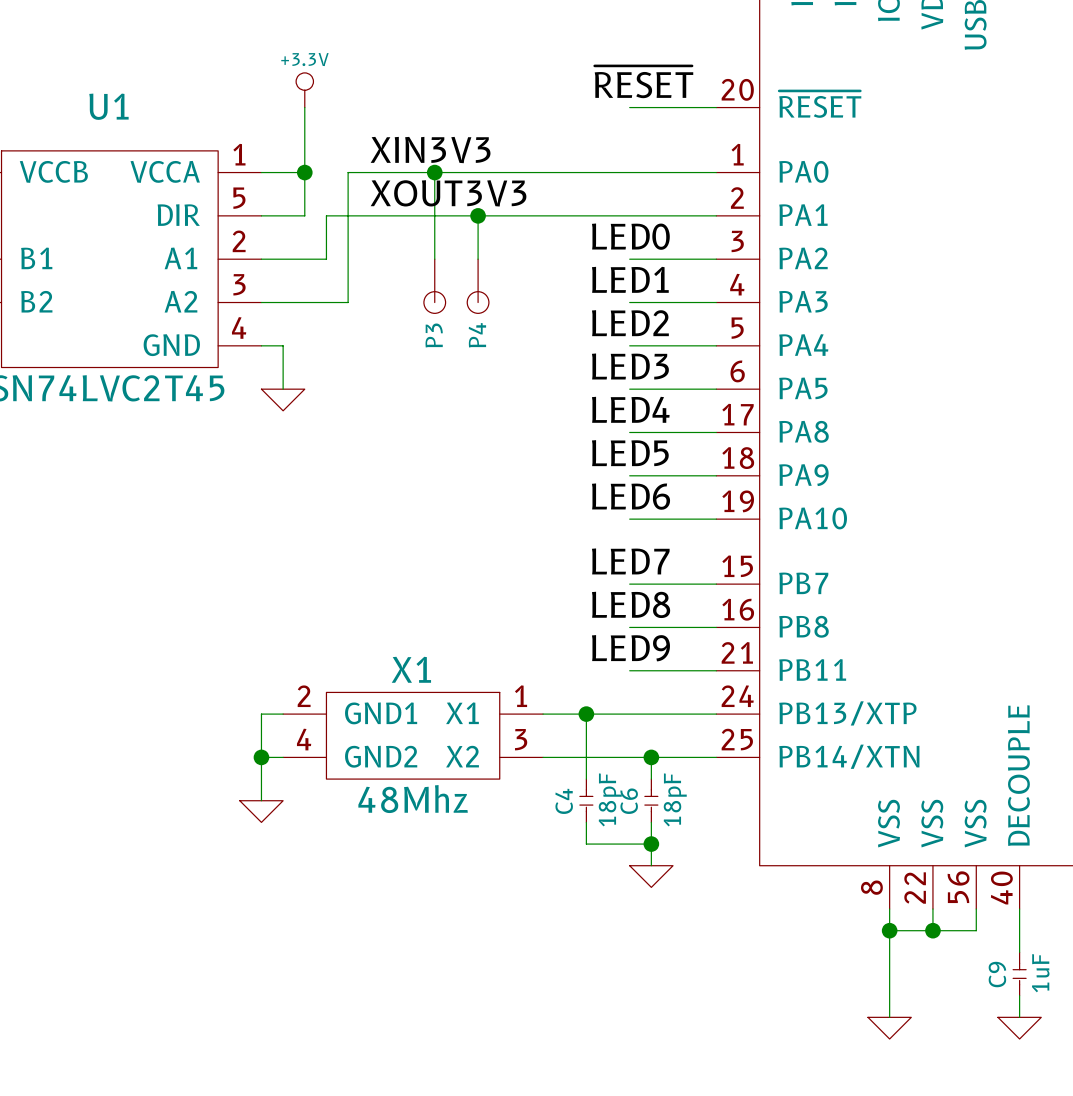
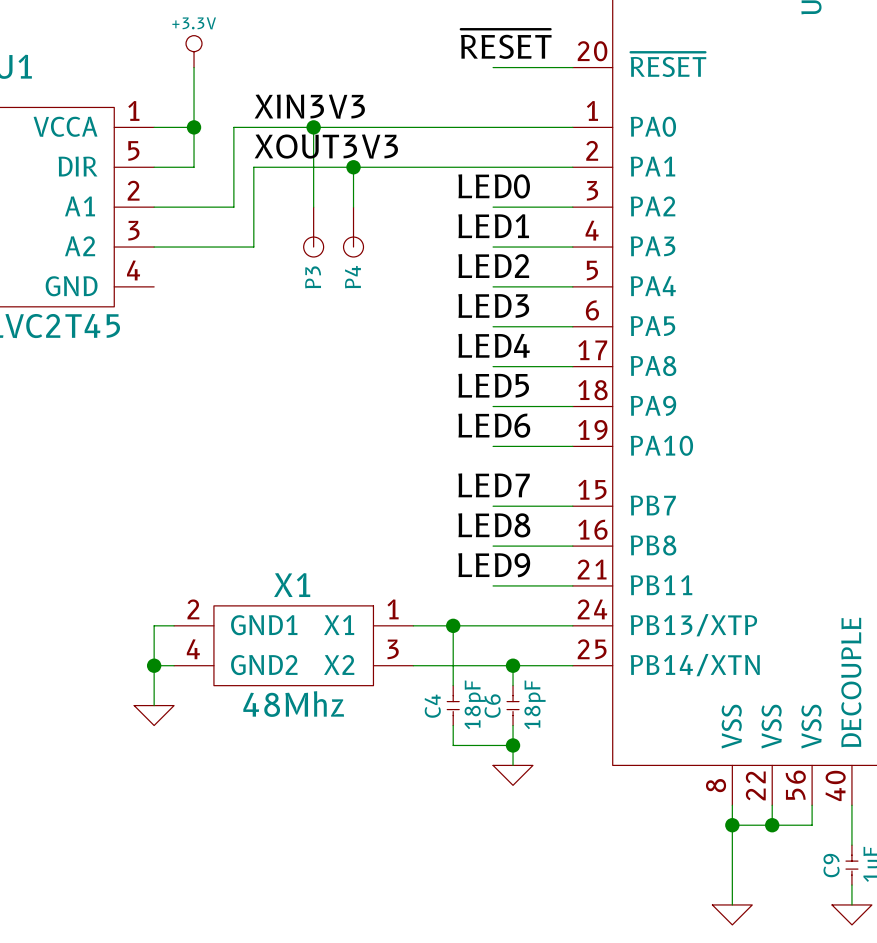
wire: (369, 215) (326, 215) (326, 259) -> (253, 167) (253, 247) (233, 247)
wire: (348, 259) (348, 302) -> (233, 207) (213, 207)
wire: (261, 345) (283, 345) (283, 389) -> none
power symbol: (283, 399) -> none

